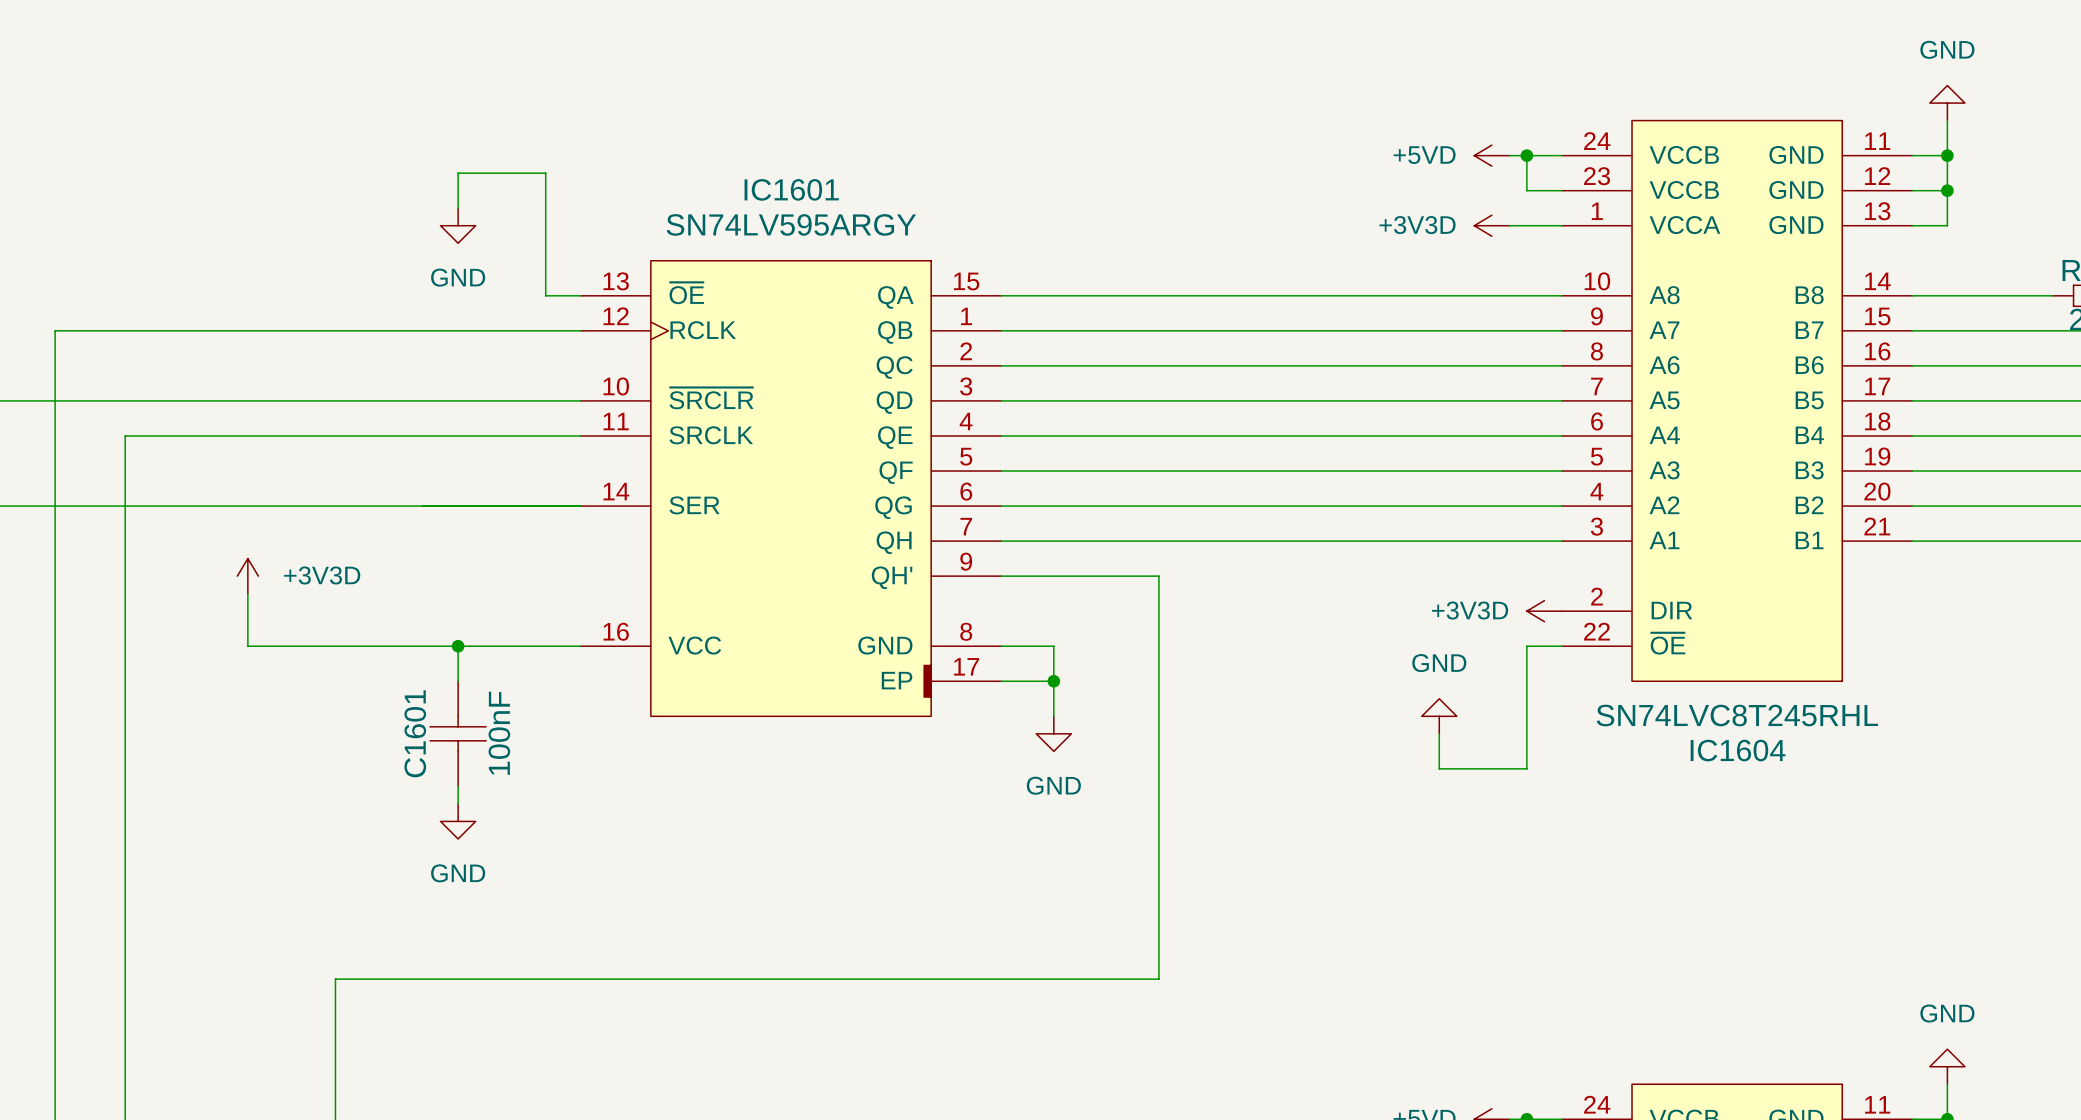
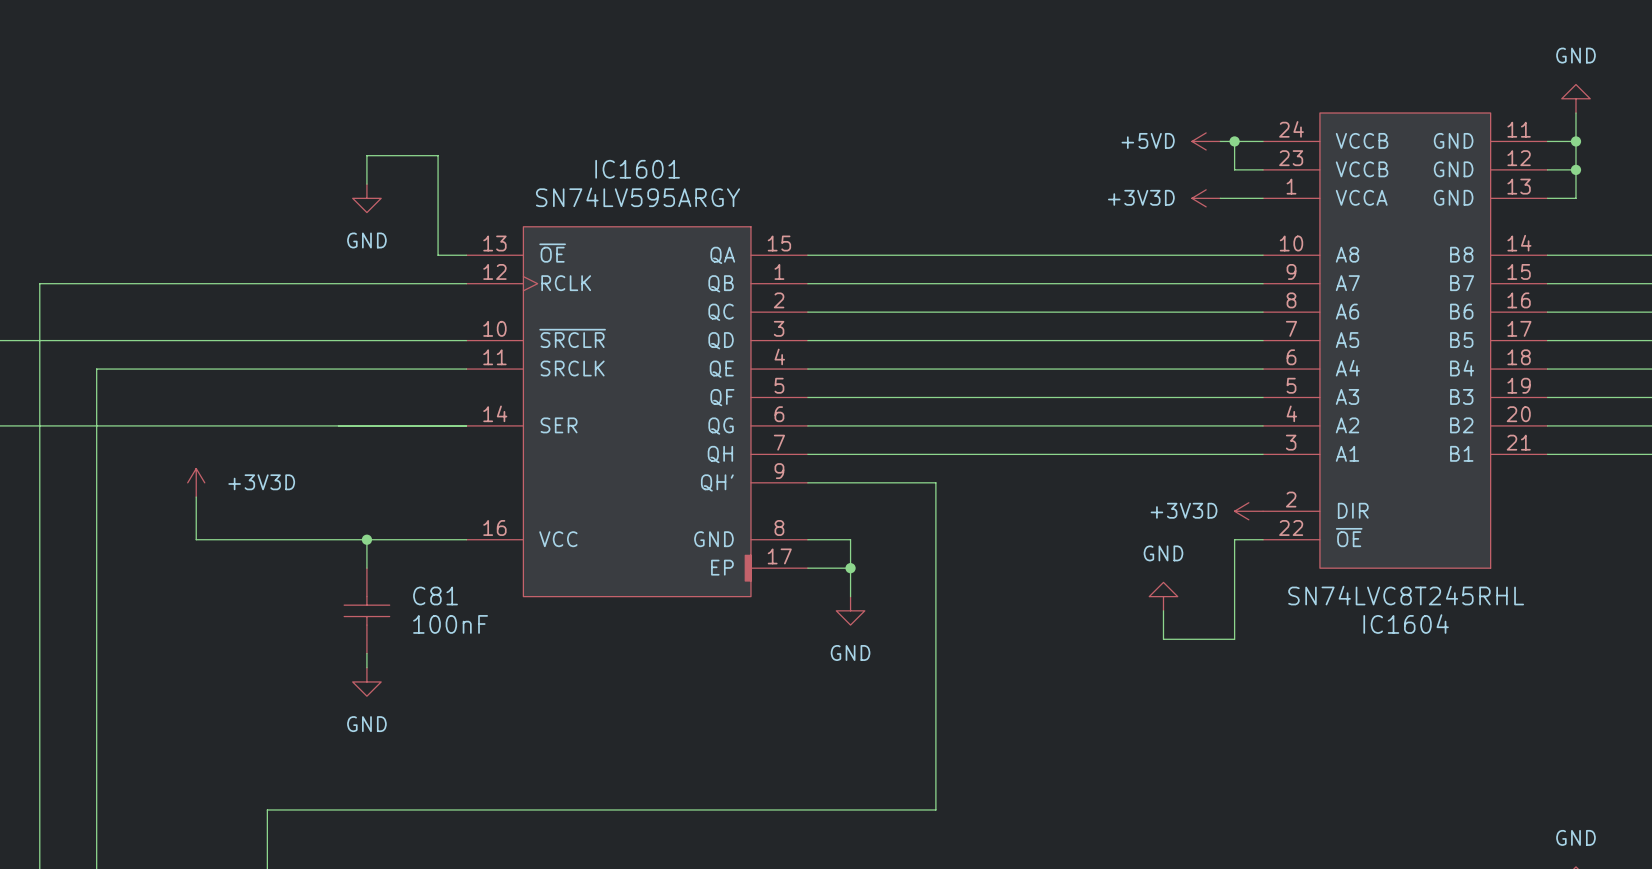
C1601 name: C1601 (415, 733) -> C81 (435, 595)
C1601 value rotation: 0° (499, 733) -> 90° clockwise (450, 624)

